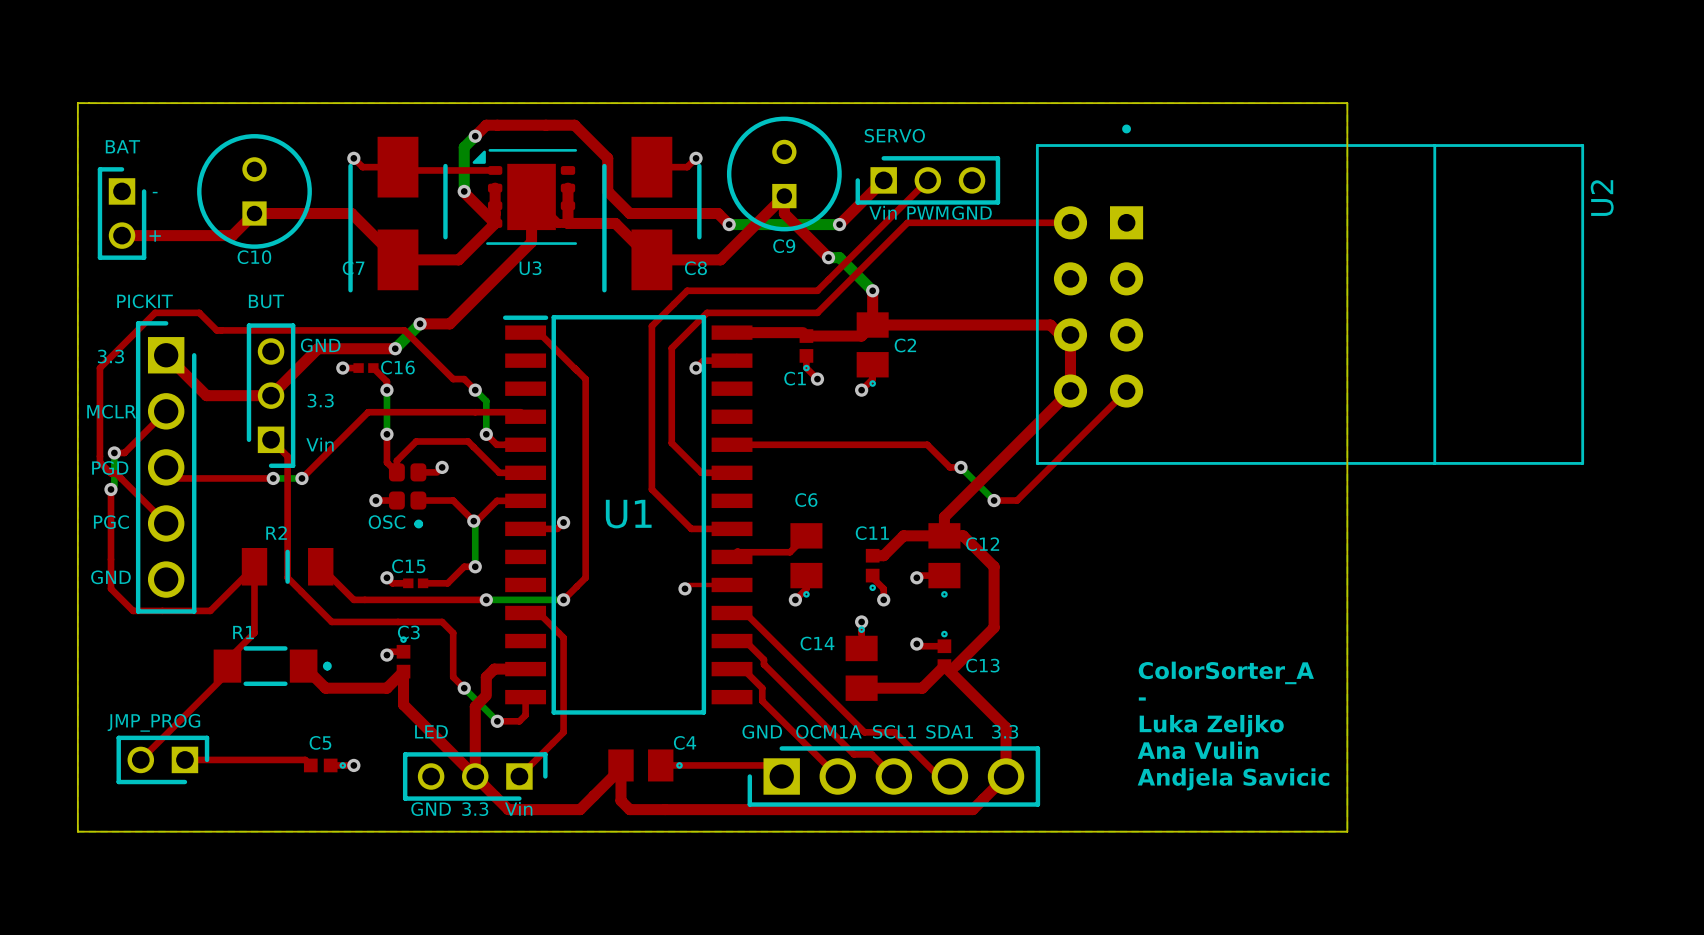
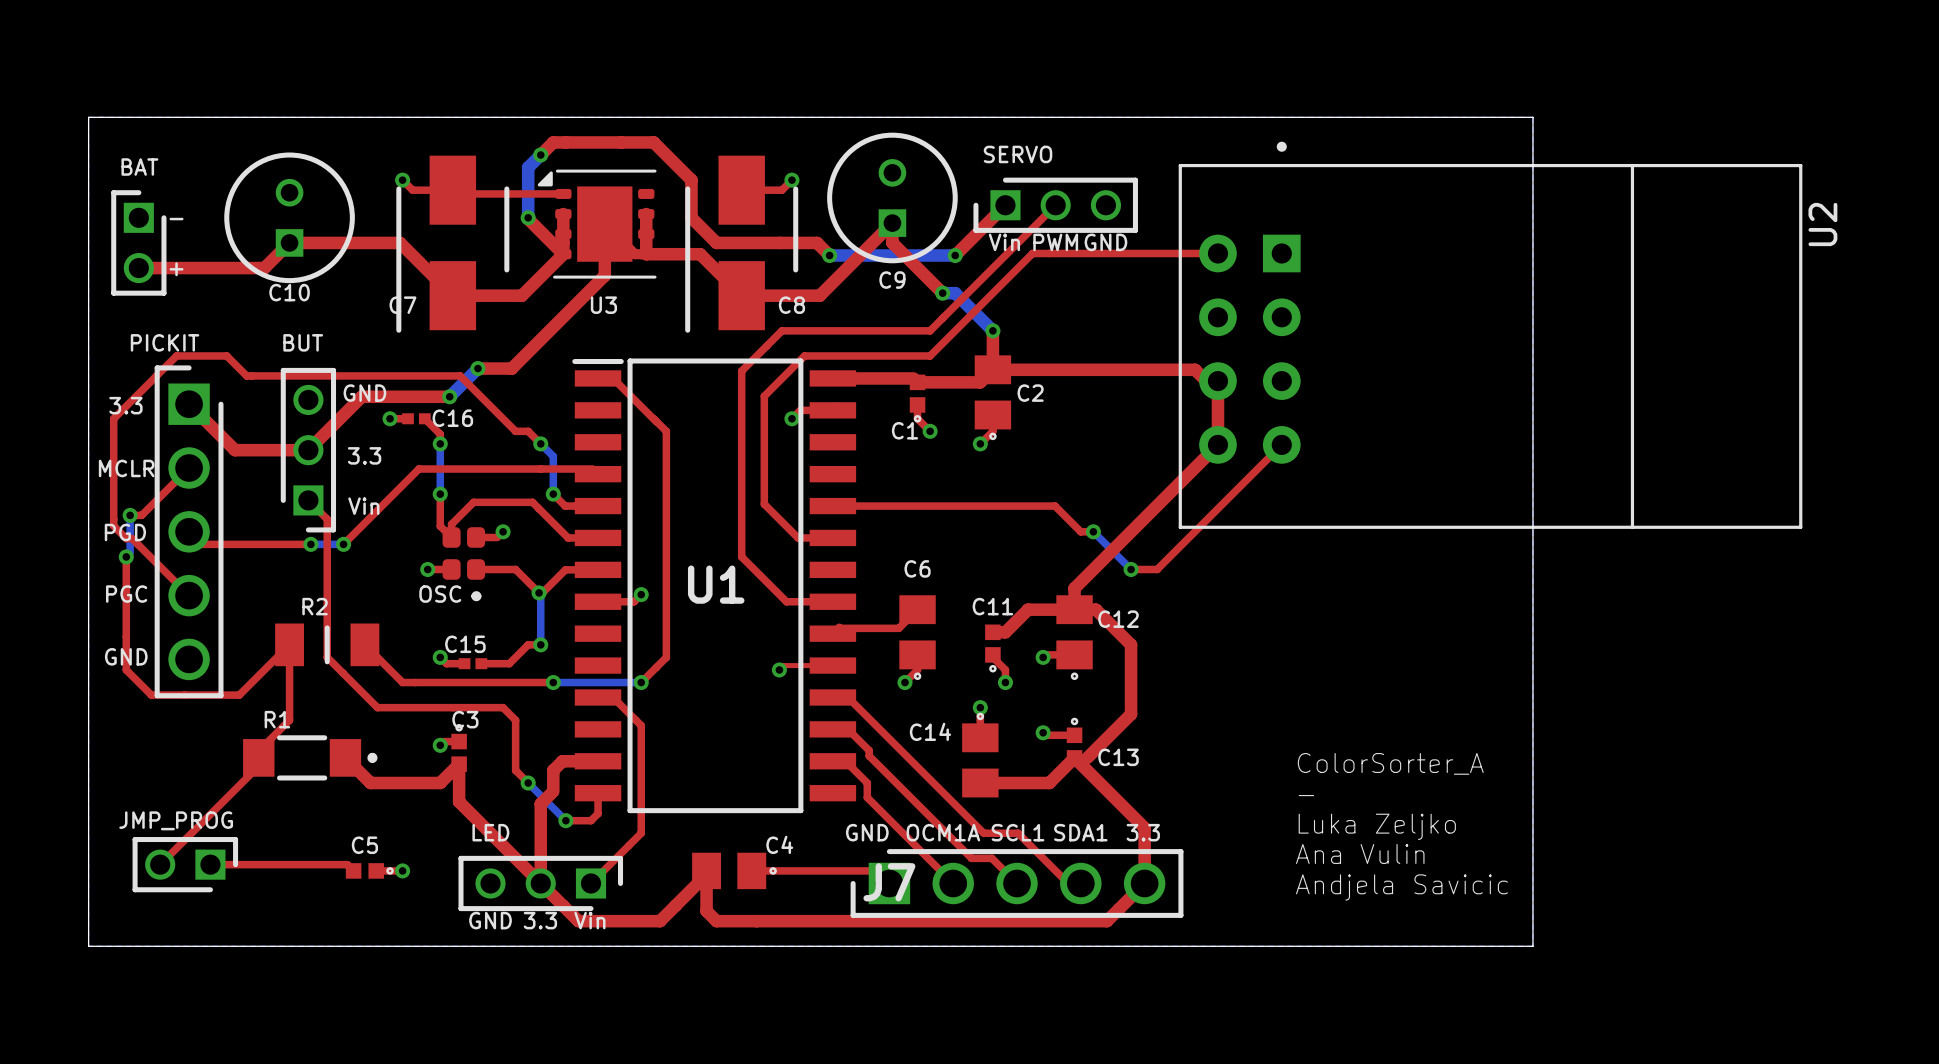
J7 name: none -> J7 (889, 882)

